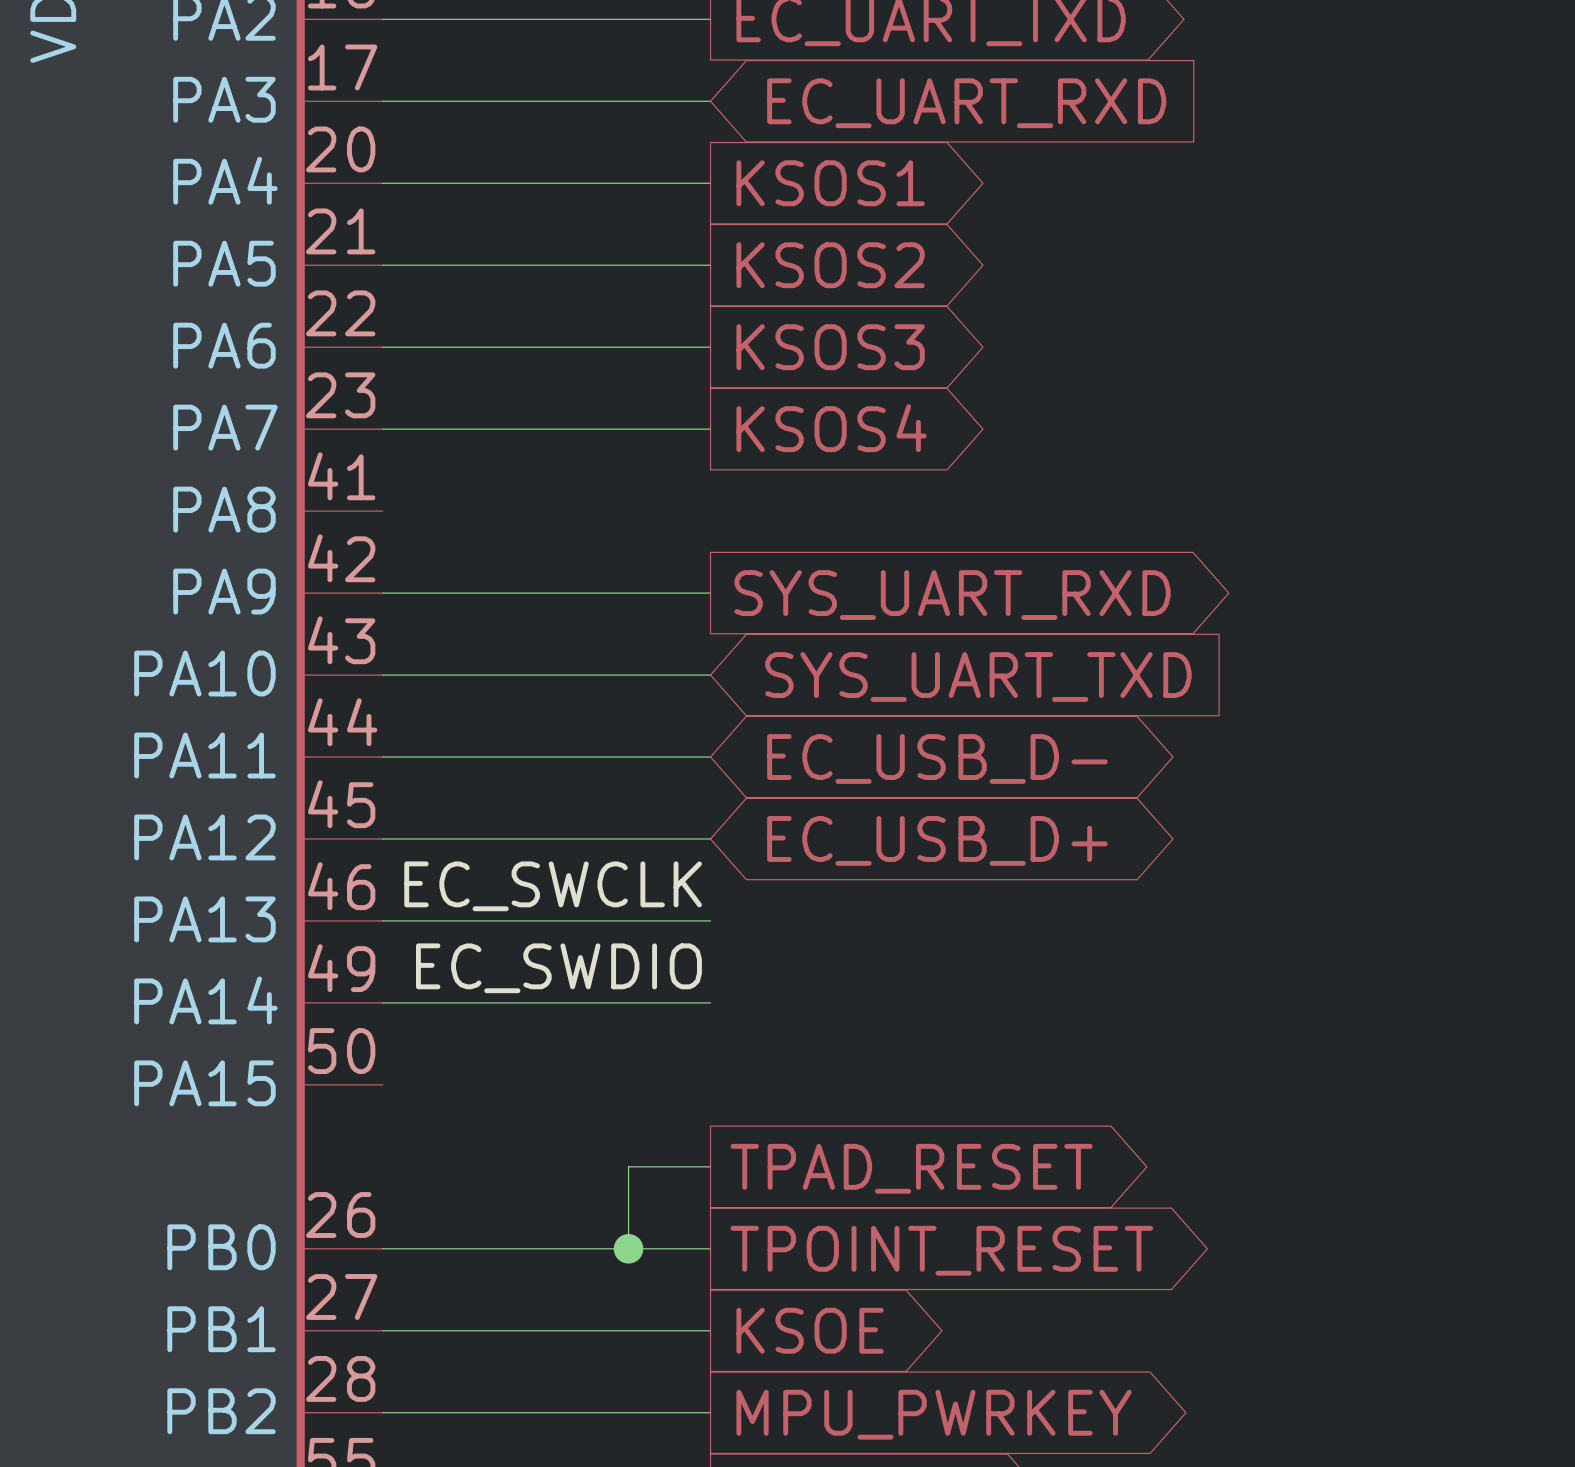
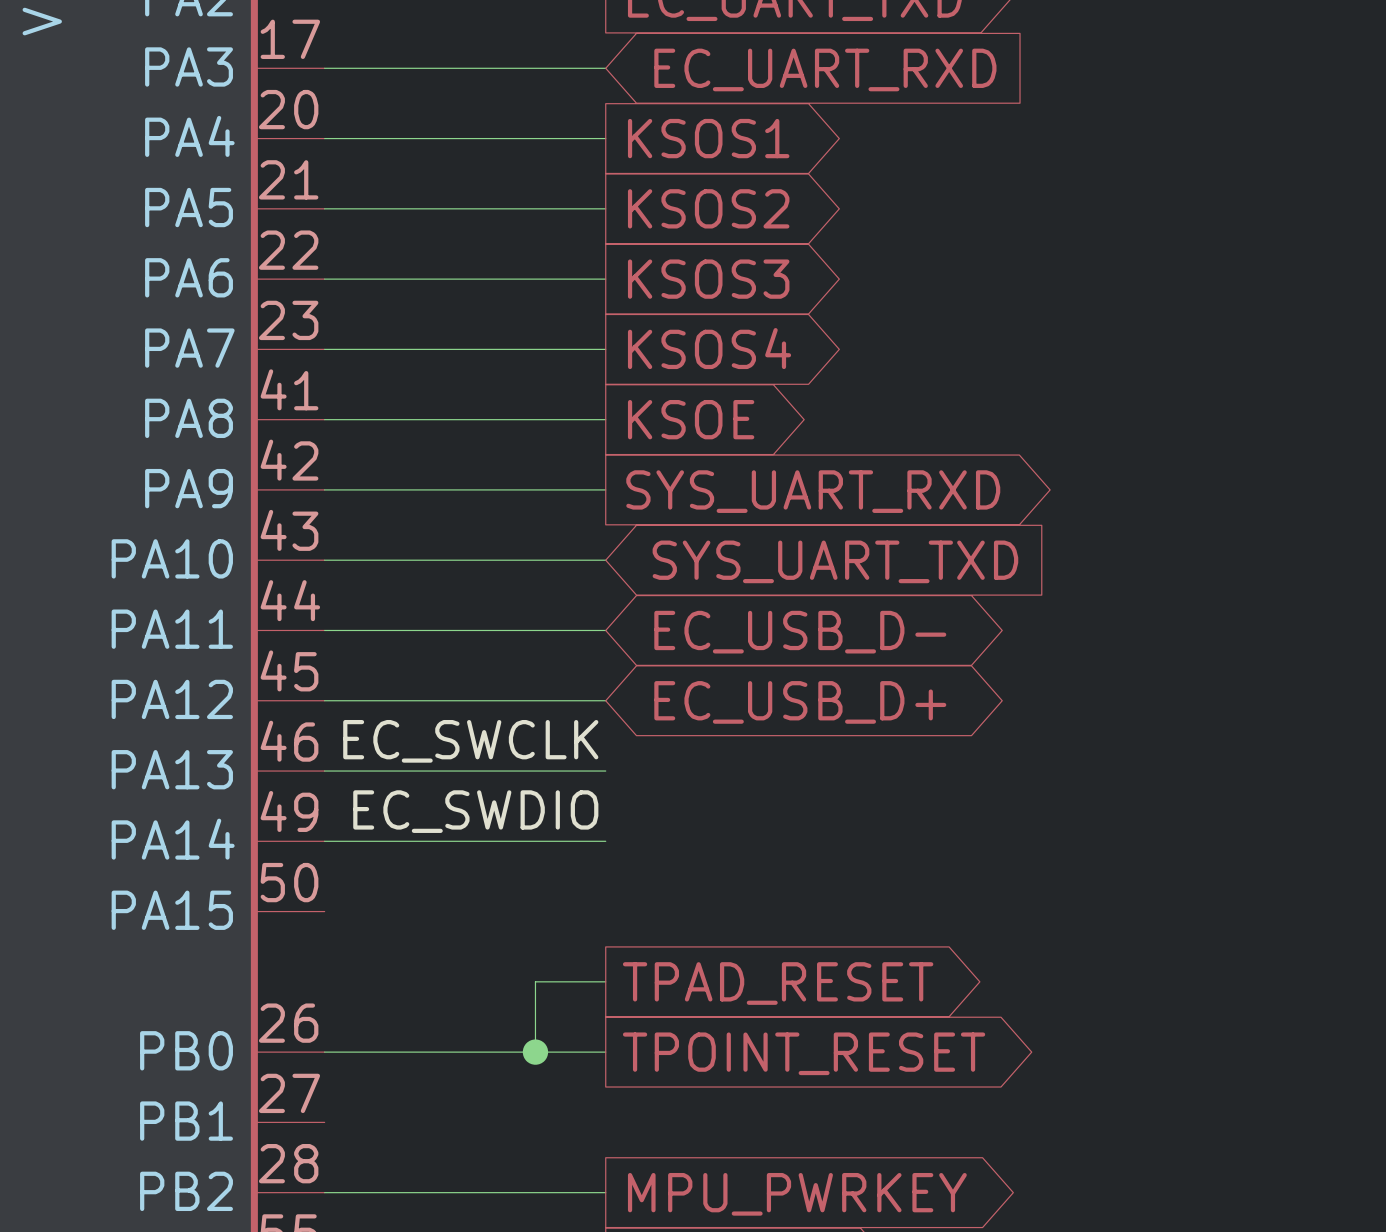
wire: none -> (324, 419) (605, 419)
global label: none -> KSOE (691, 419)
wire: (382, 1330) (710, 1330) -> none
global label: KSOE (810, 1330) -> none

